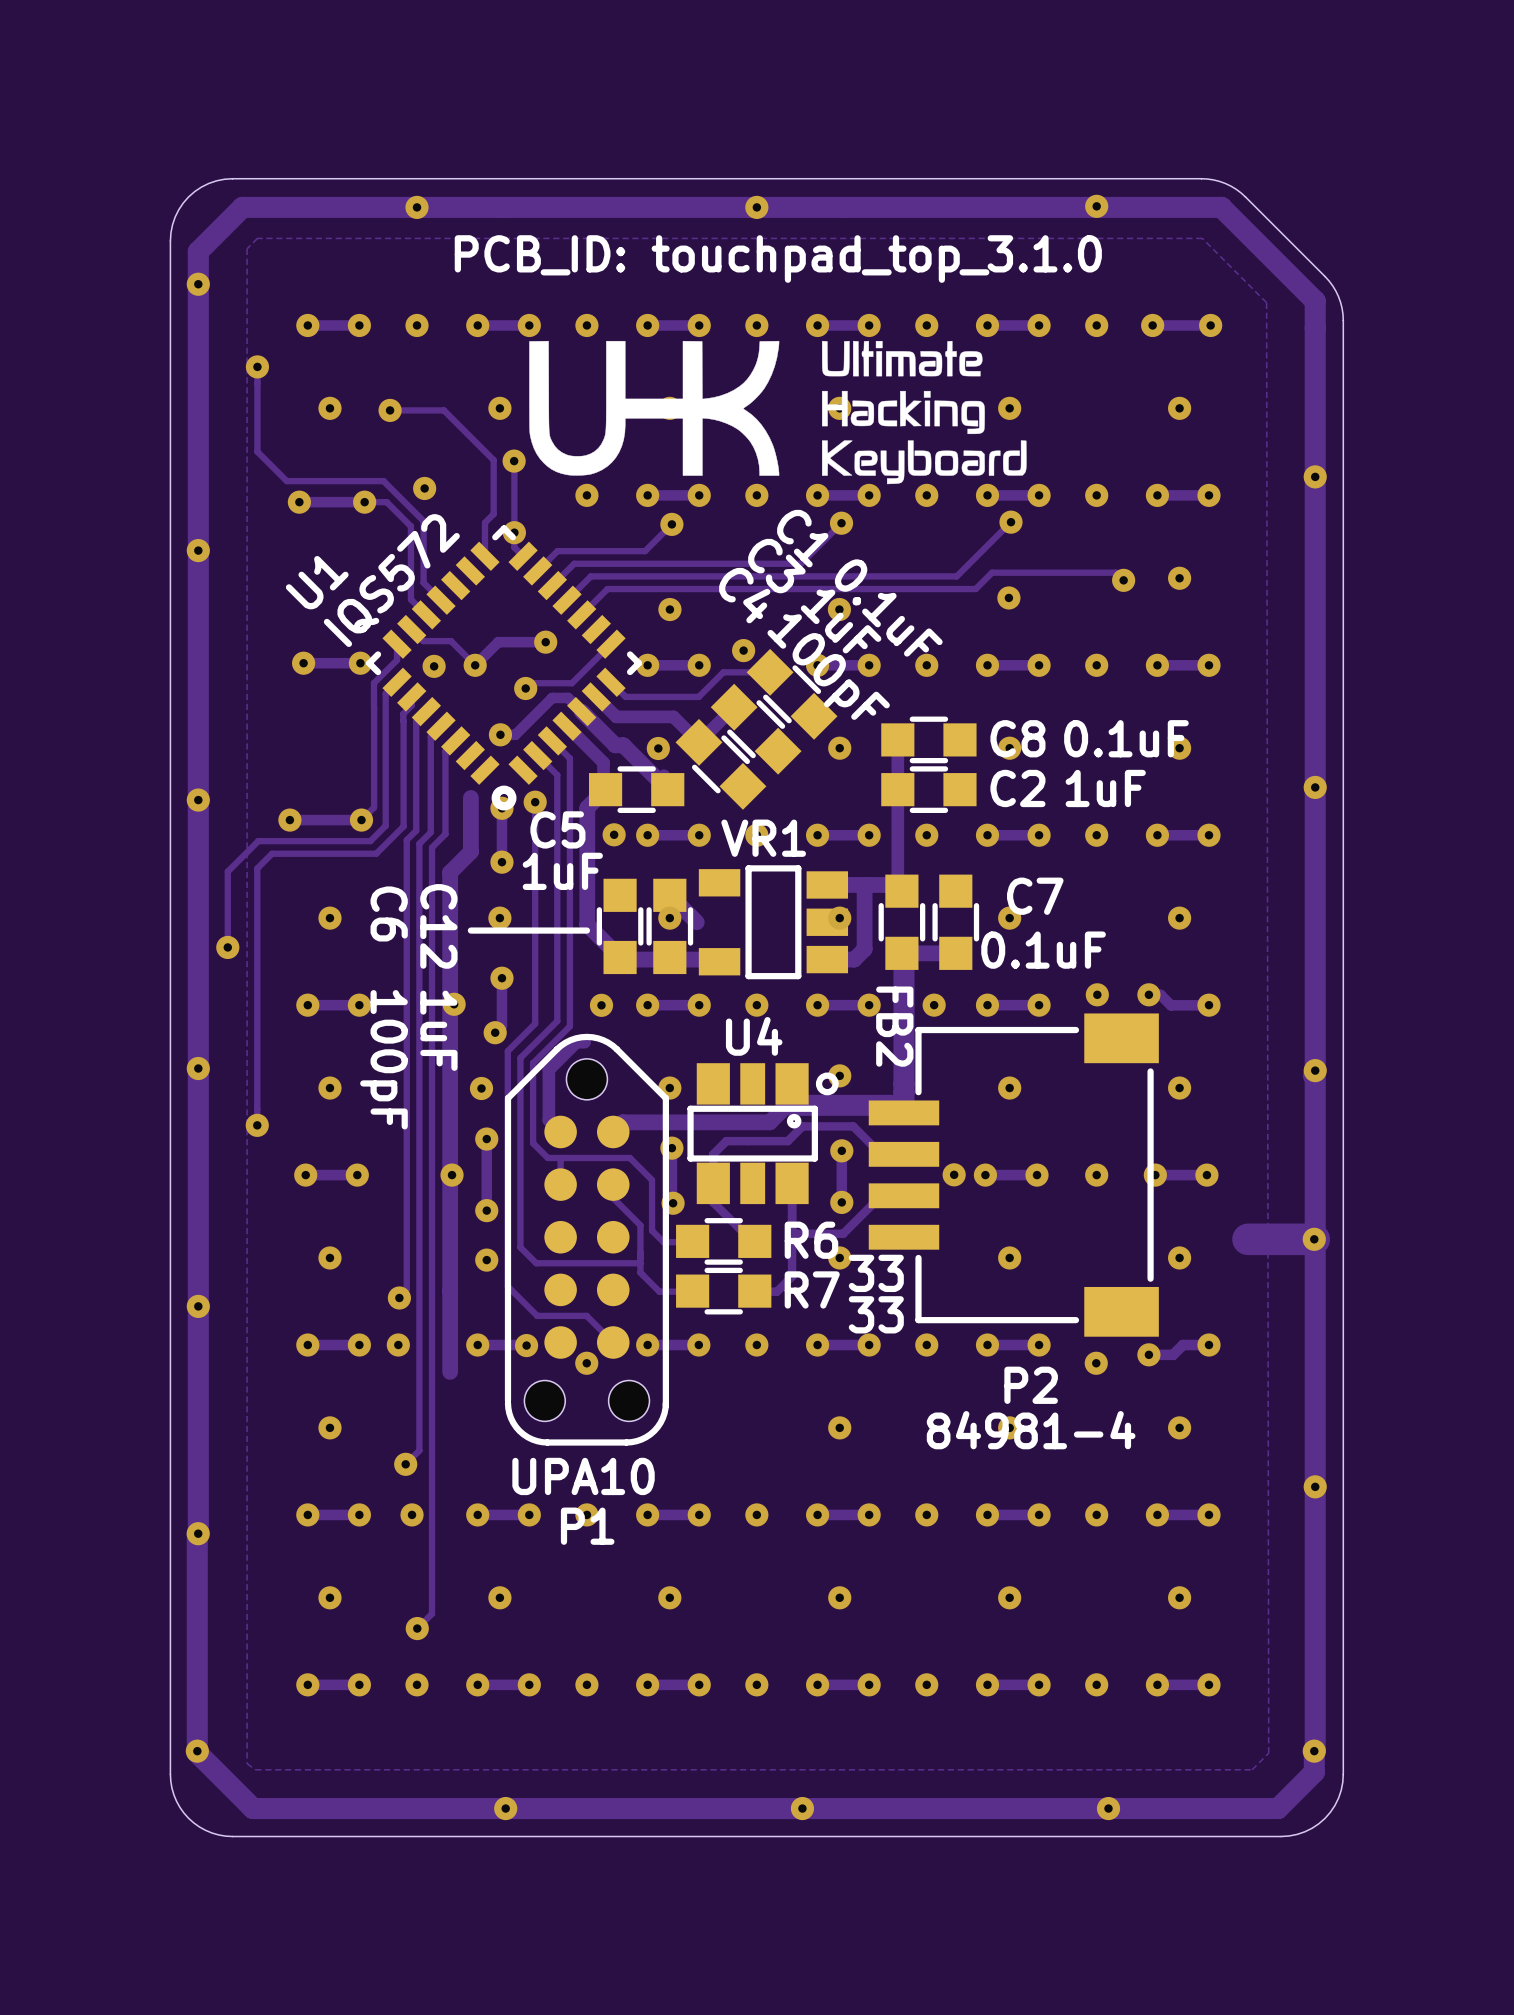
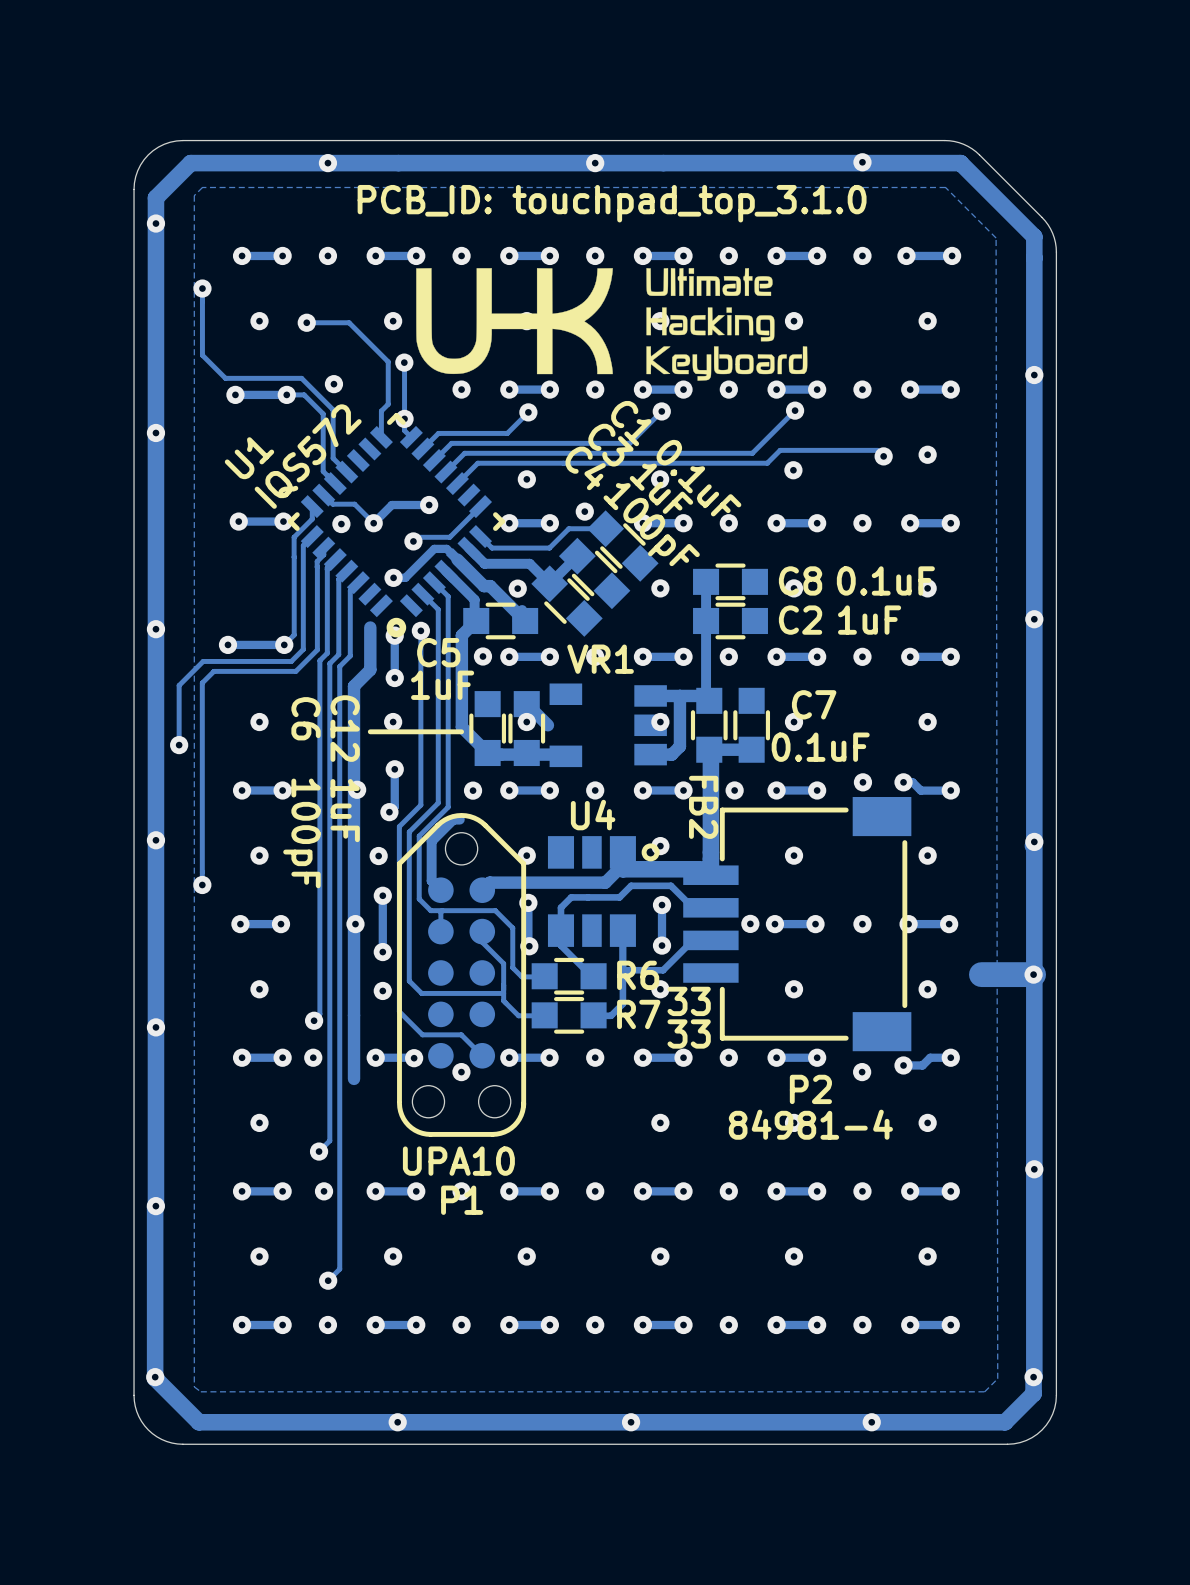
VR1 footprint: [698, 865, 849, 980] -> [549, 683, 667, 768]
U4 footprint: [687, 1063, 839, 1205] -> [547, 836, 660, 947]

